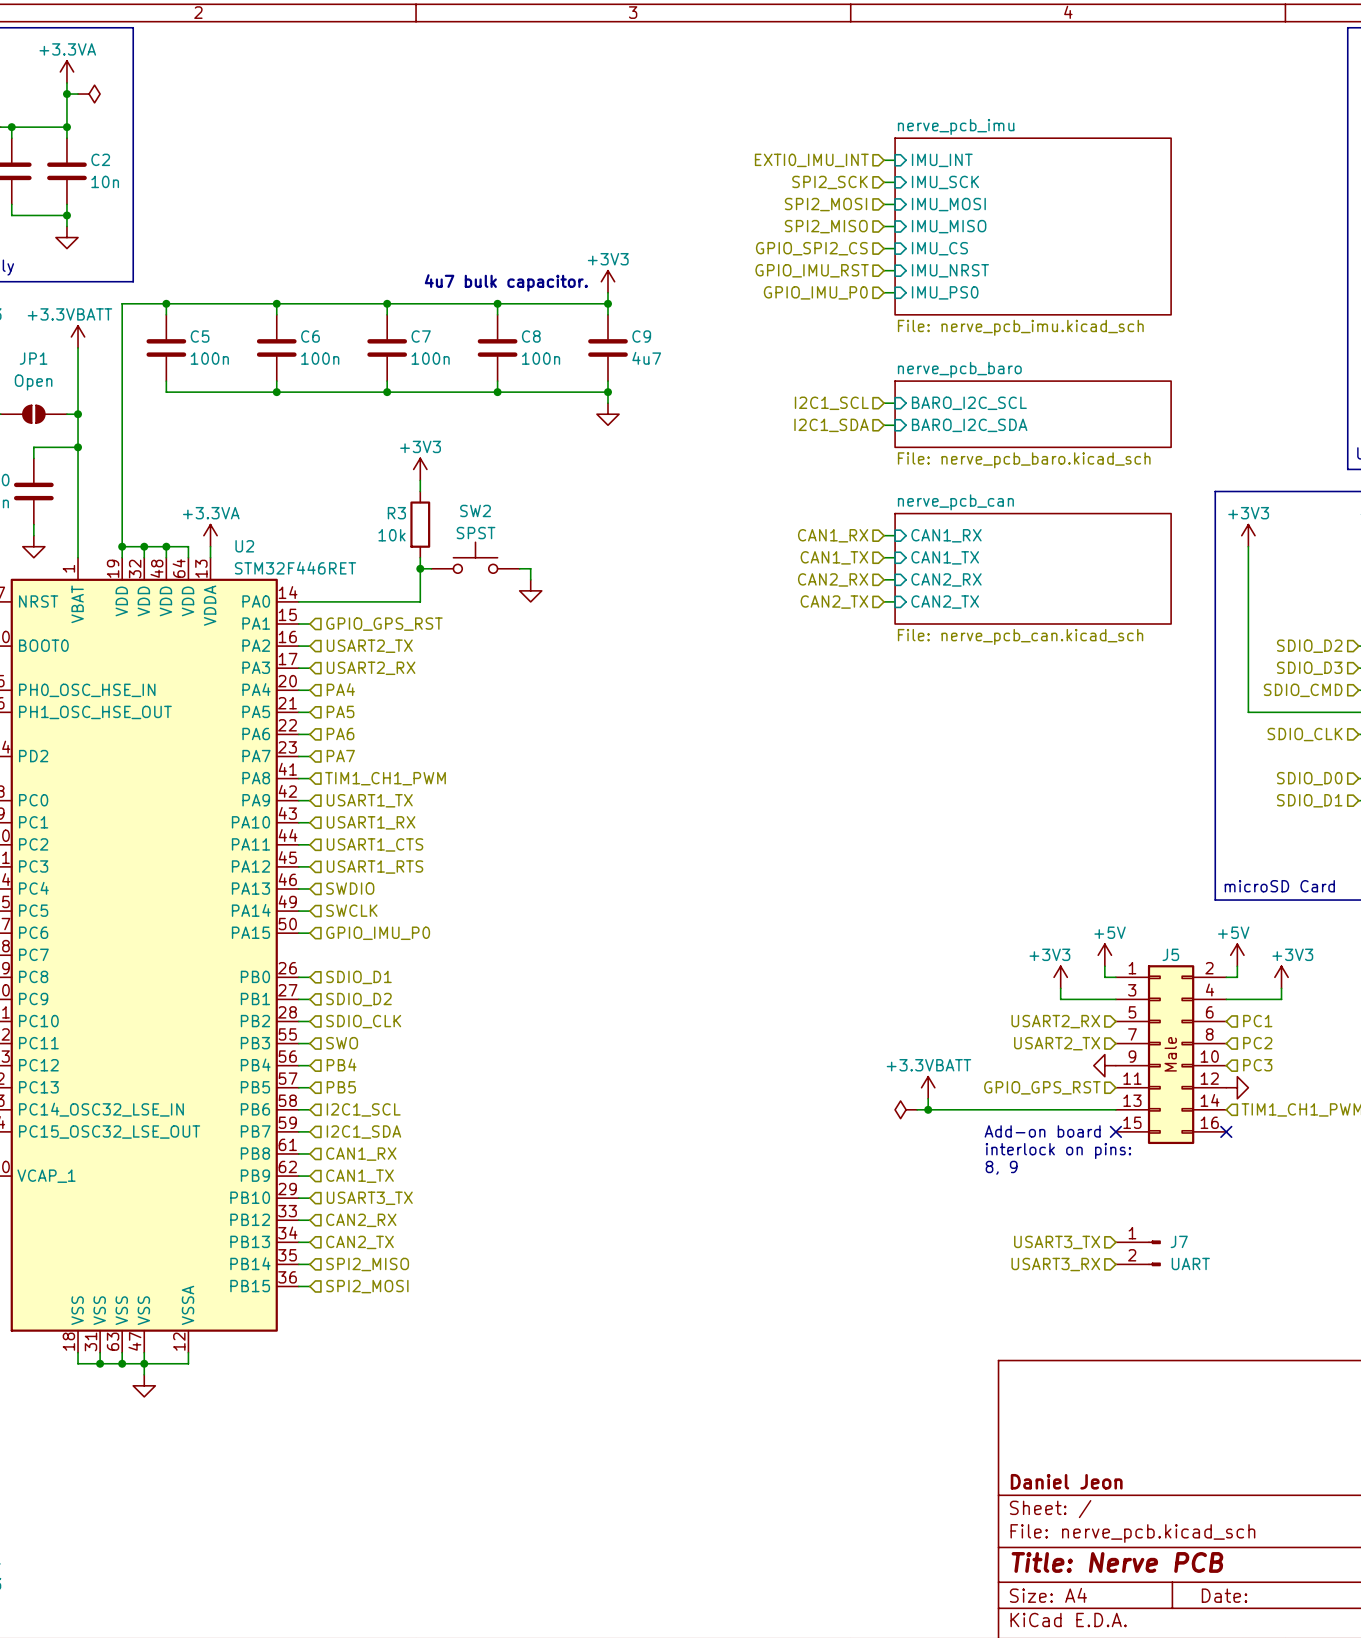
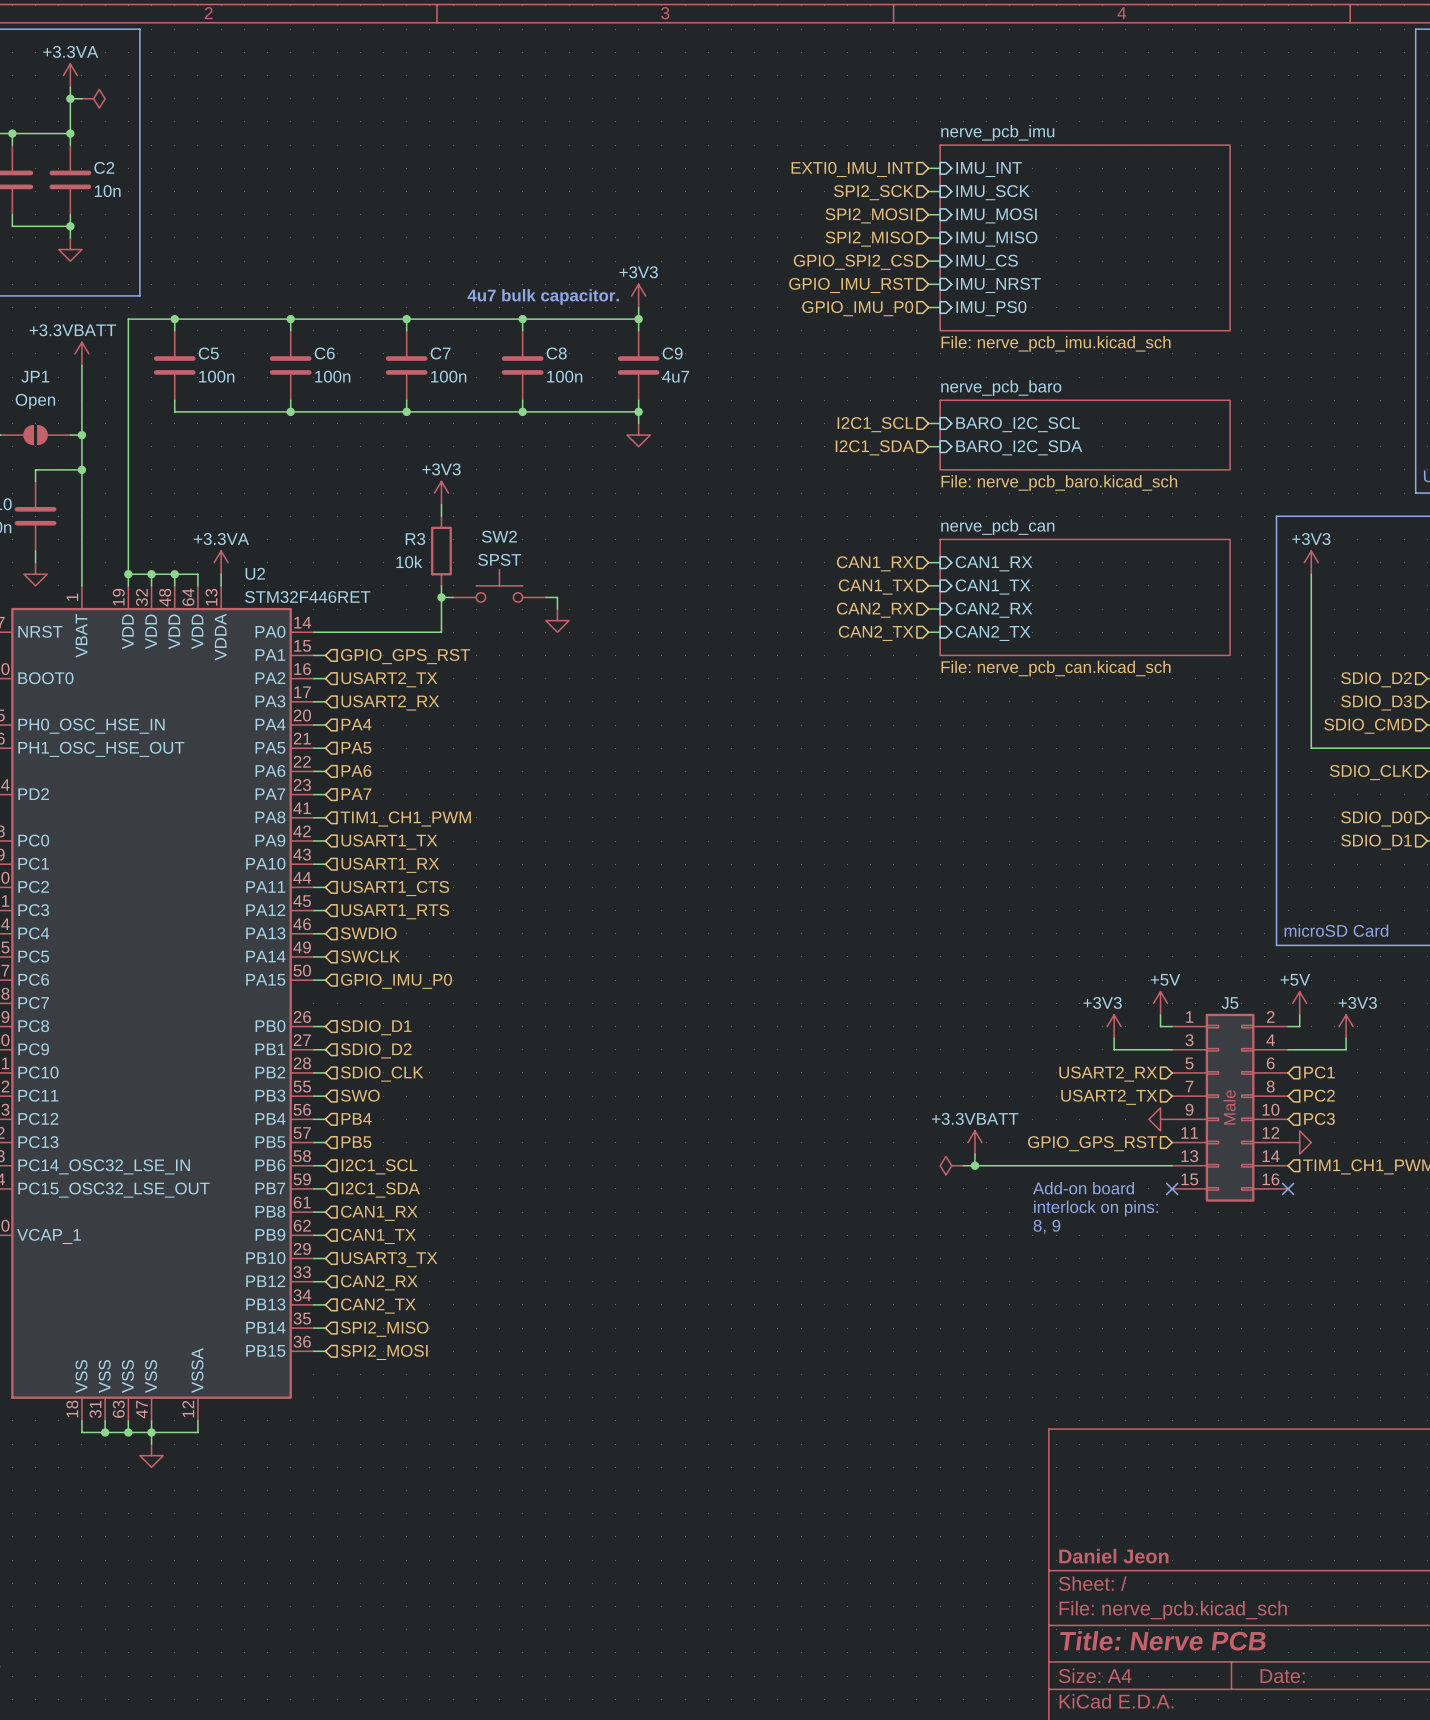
hierarchical label: USART3_TX (1057, 1242) -> none
J7: UART (1138, 1253) -> none
hierarchical label: USART3_RX (1055, 1264) -> none

